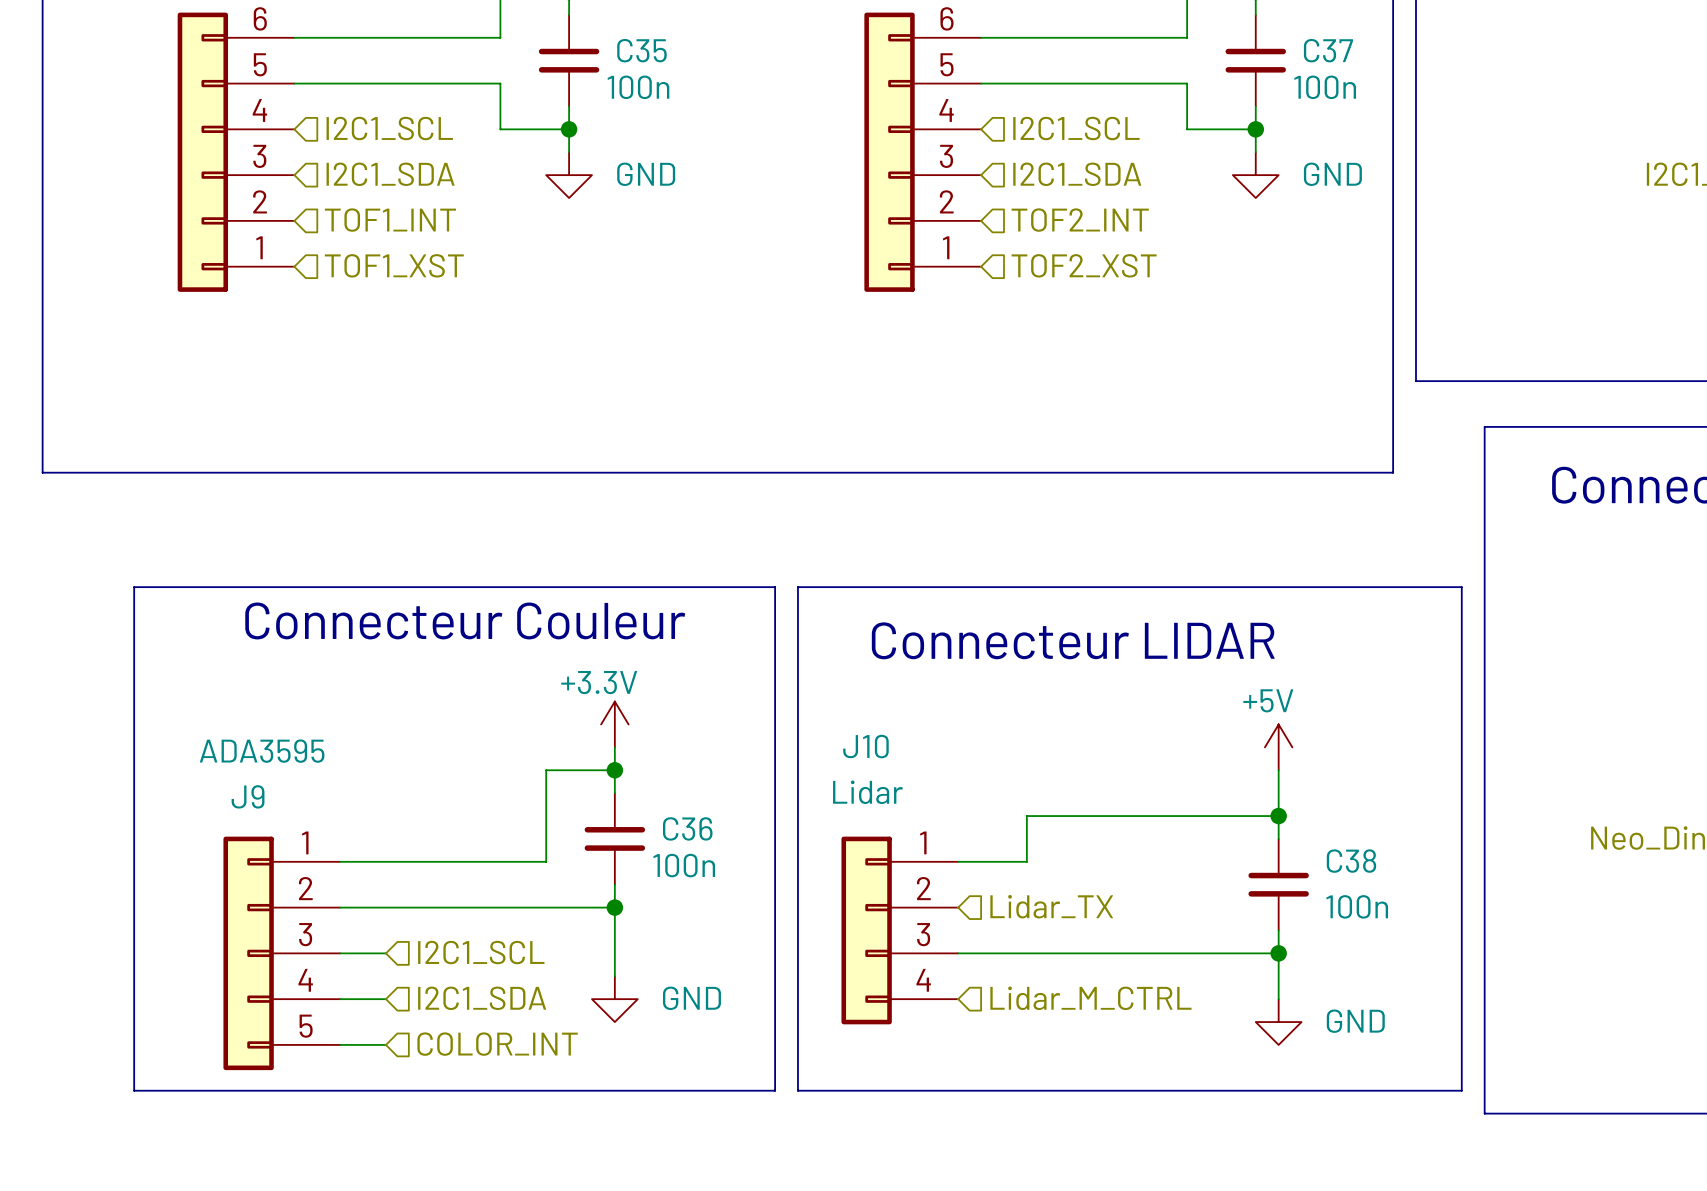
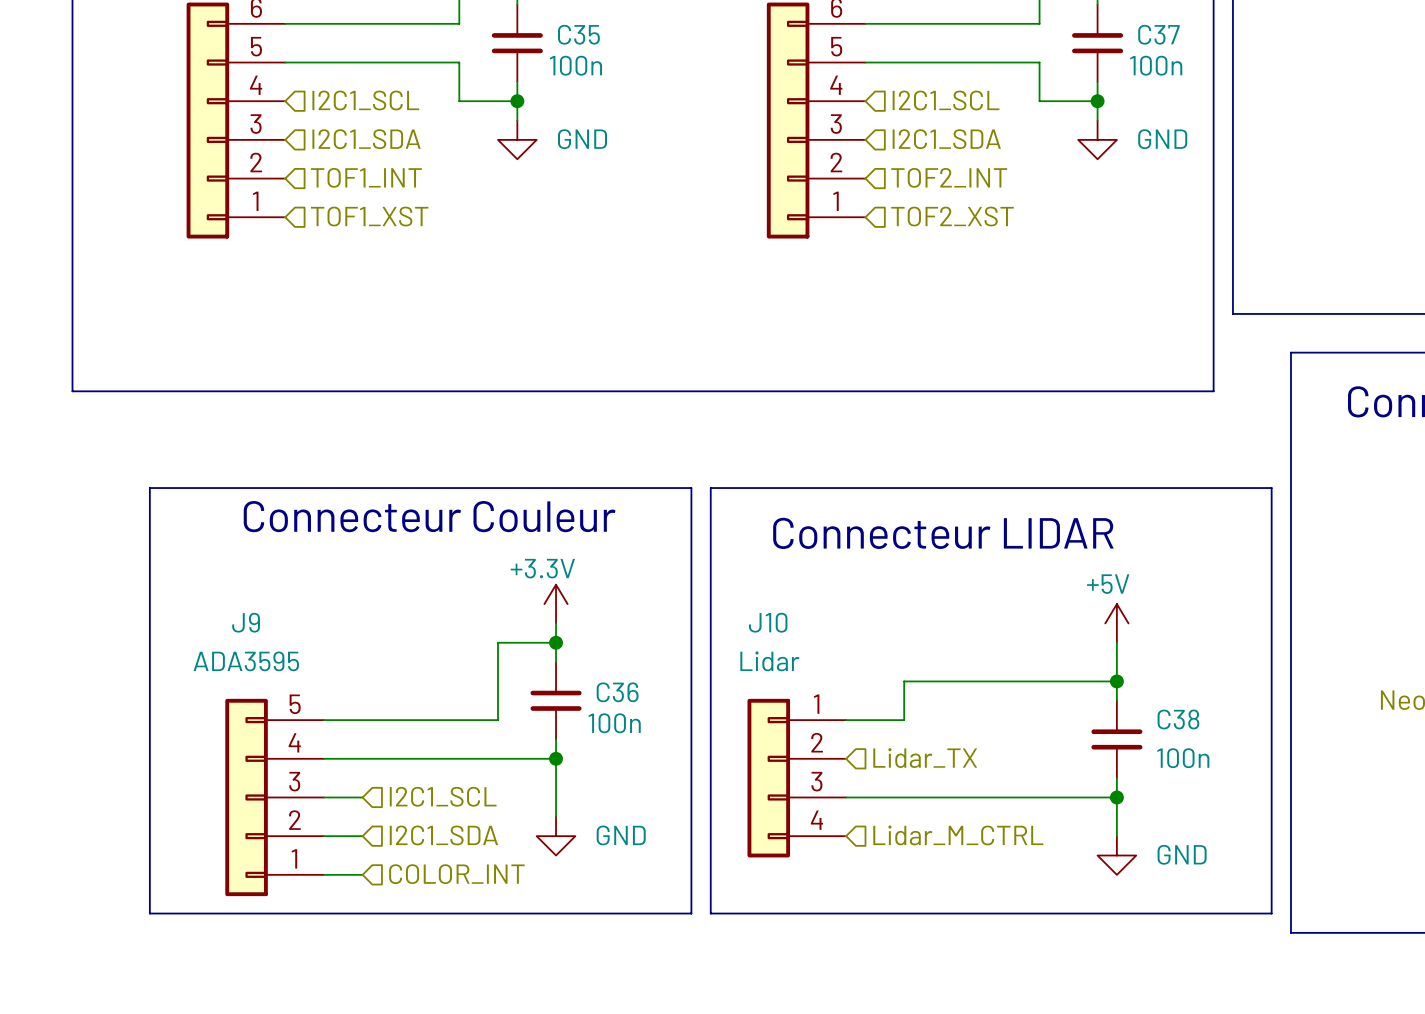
J9 value position: ADA3595 (262, 751) -> ADA3595 (246, 661)
J9 name position: J9 (248, 796) -> J9 (246, 622)
J9 flip: as is (248, 953) -> up-down (246, 797)

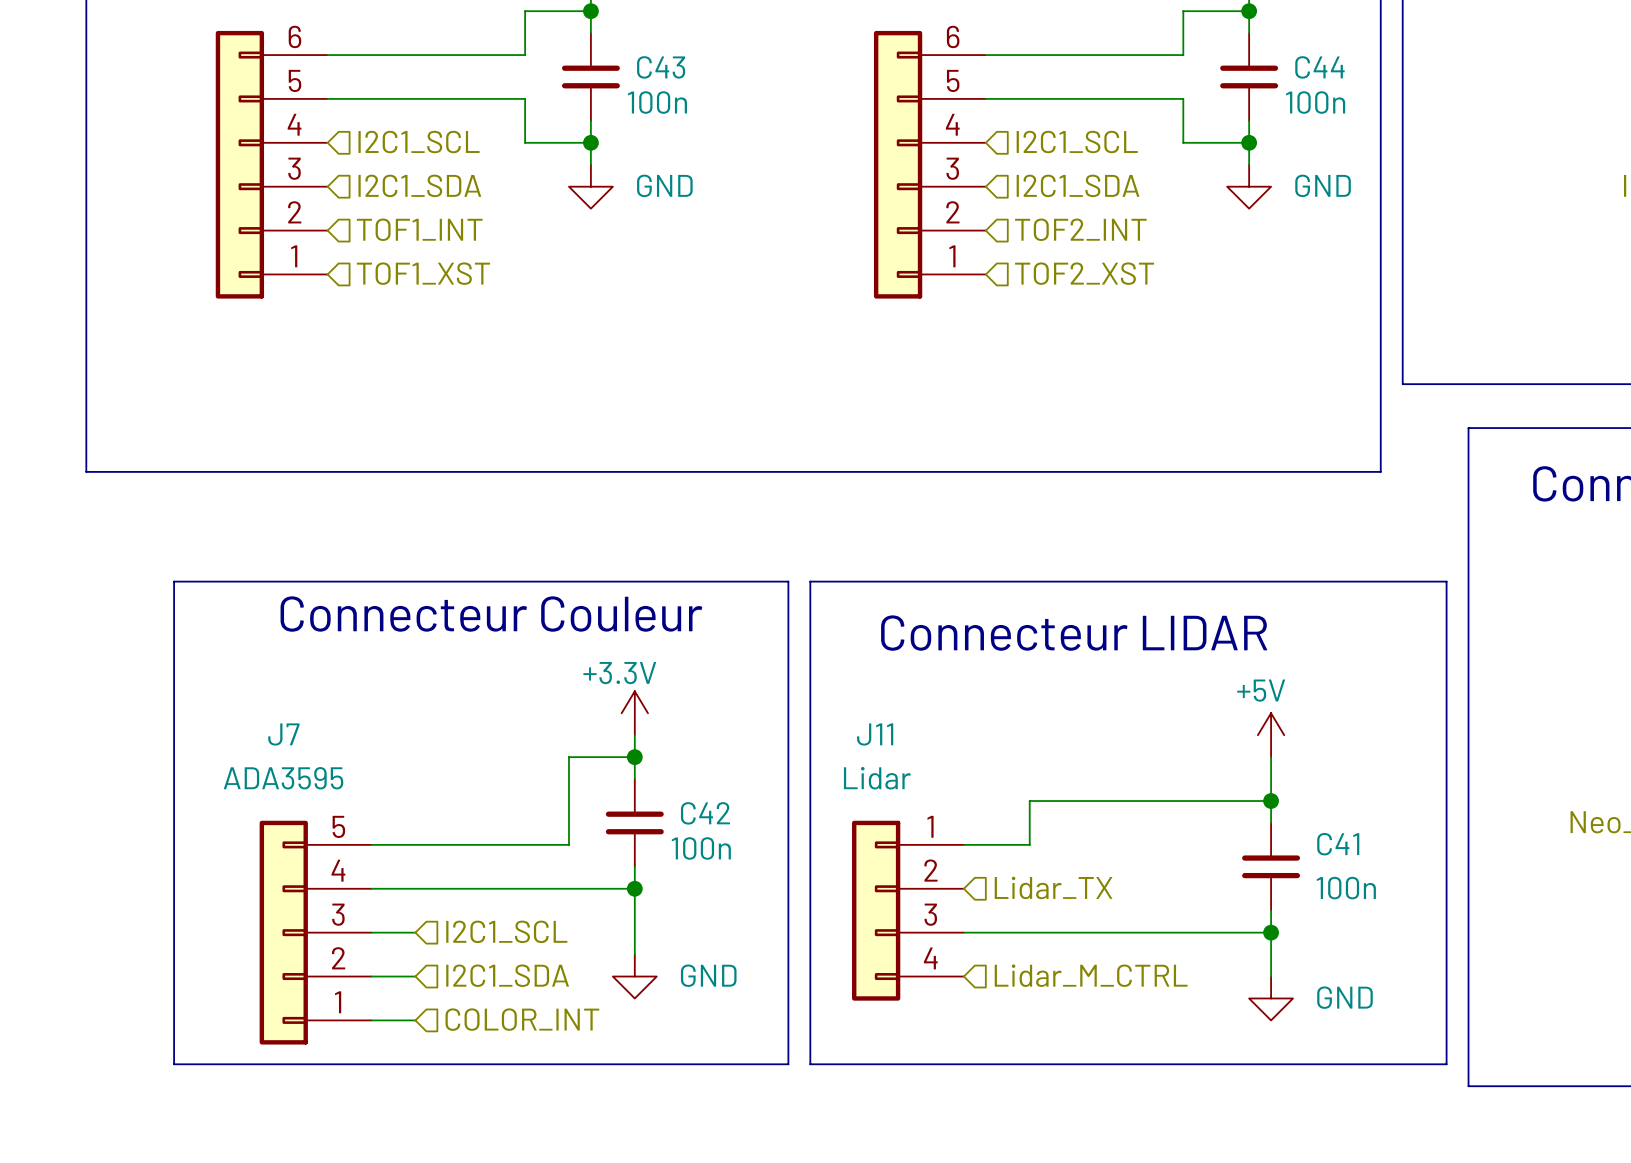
C35 name: C35 (578, 34) -> C43 (661, 67)
C37 name: C37 (1158, 34) -> C44 (1319, 67)
J9 name: J9 (246, 622) -> J7 (283, 734)
J10 name: J10 (768, 622) -> J11 (875, 734)
C36 name: C36 (617, 692) -> C42 (705, 813)
C38 name: C38 (1178, 719) -> C41 (1338, 844)

